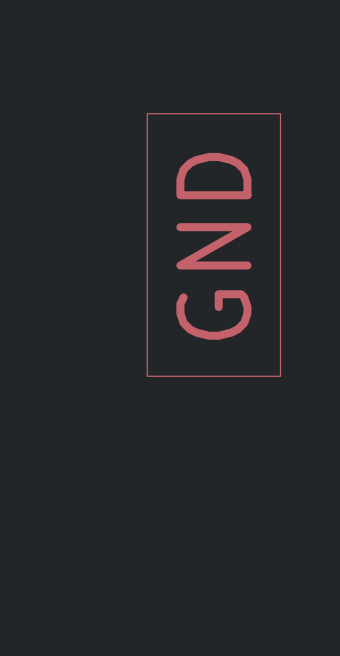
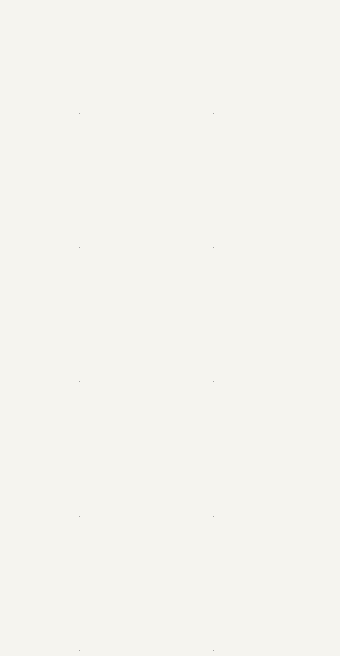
global label: GND (213, 246) -> none

